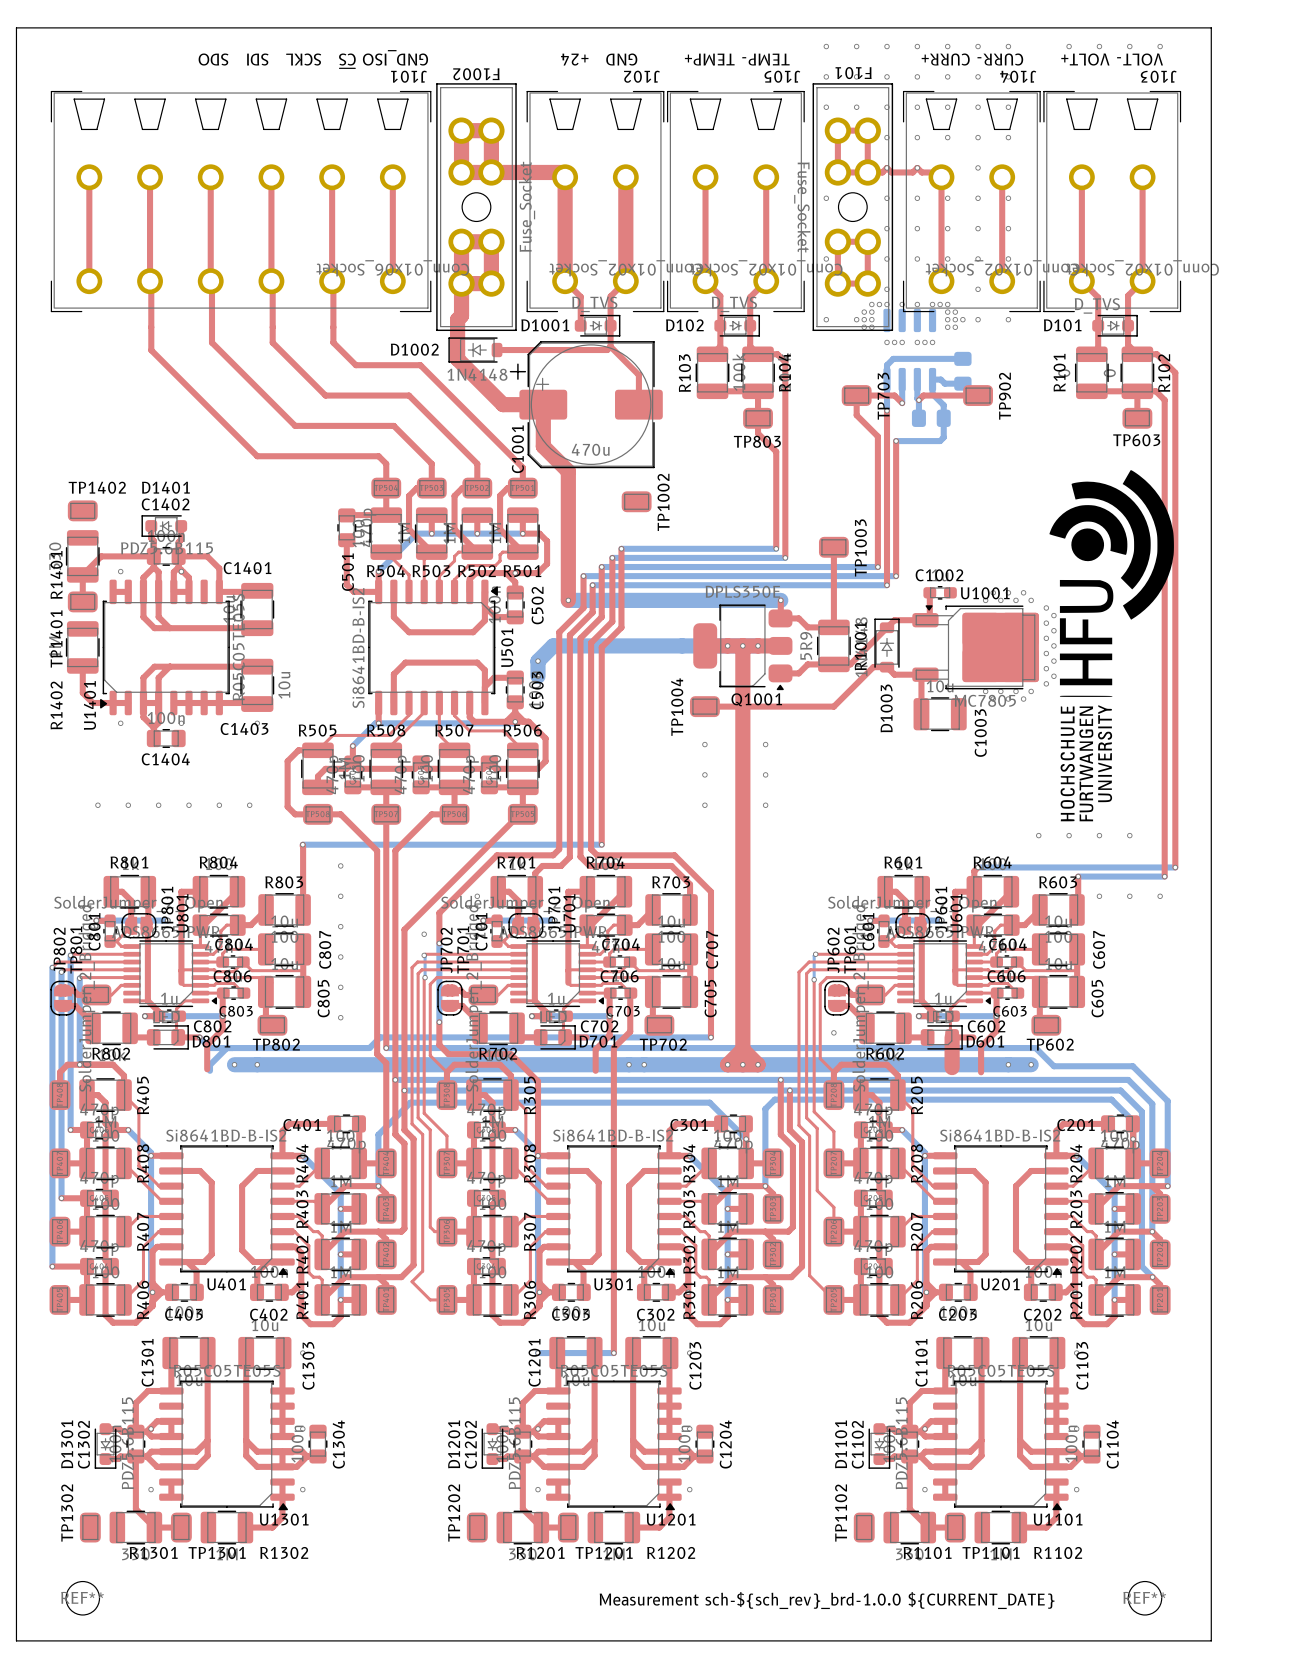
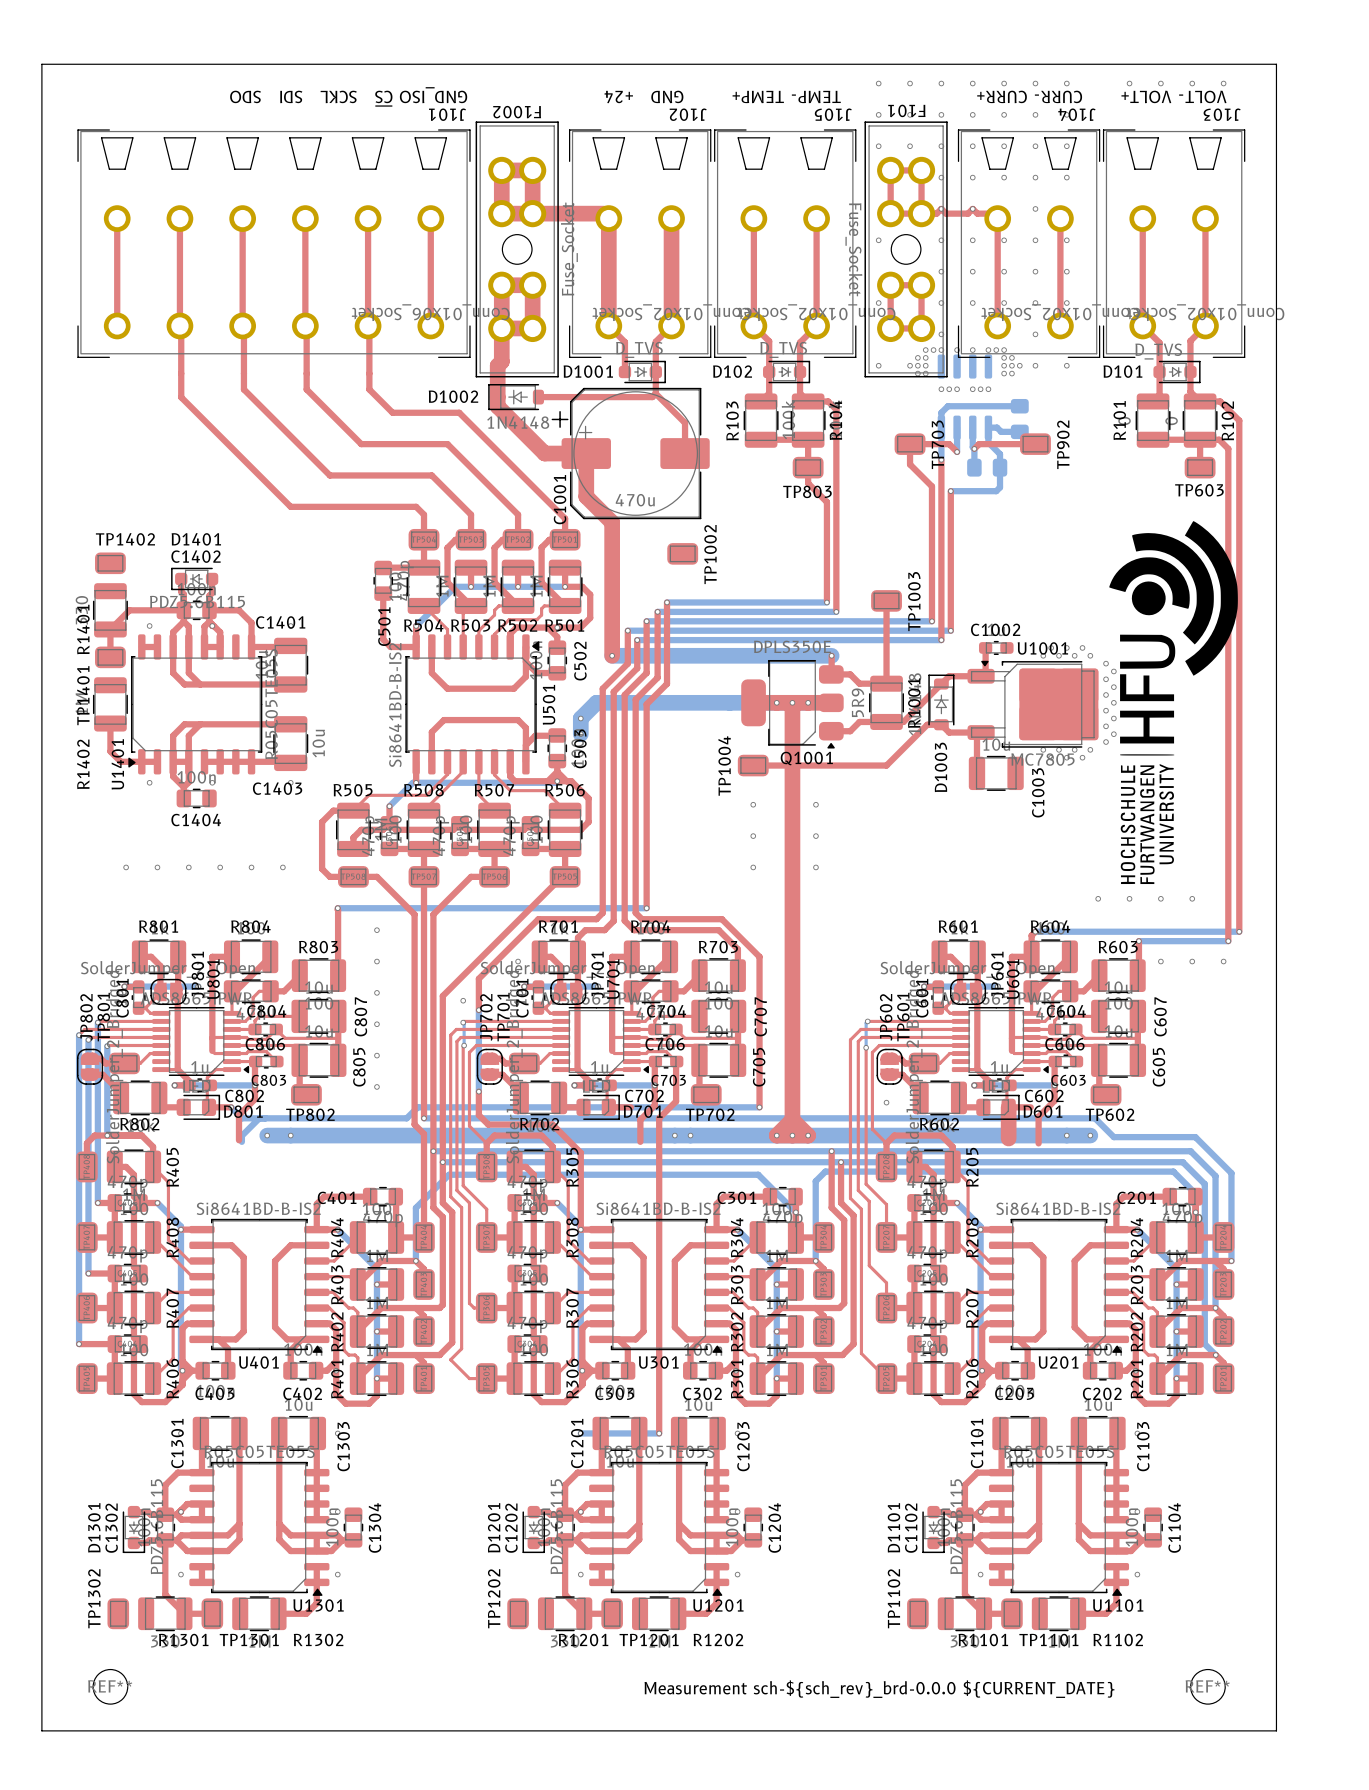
text: Measurement sch-${sch_rev}_brd-1.0.0 ${CURRENT_DATE} (827, 1600) -> Measurement sch-${sch_rev}_brd-0.0.0 ${CURRENT_DATE} (879, 1689)

